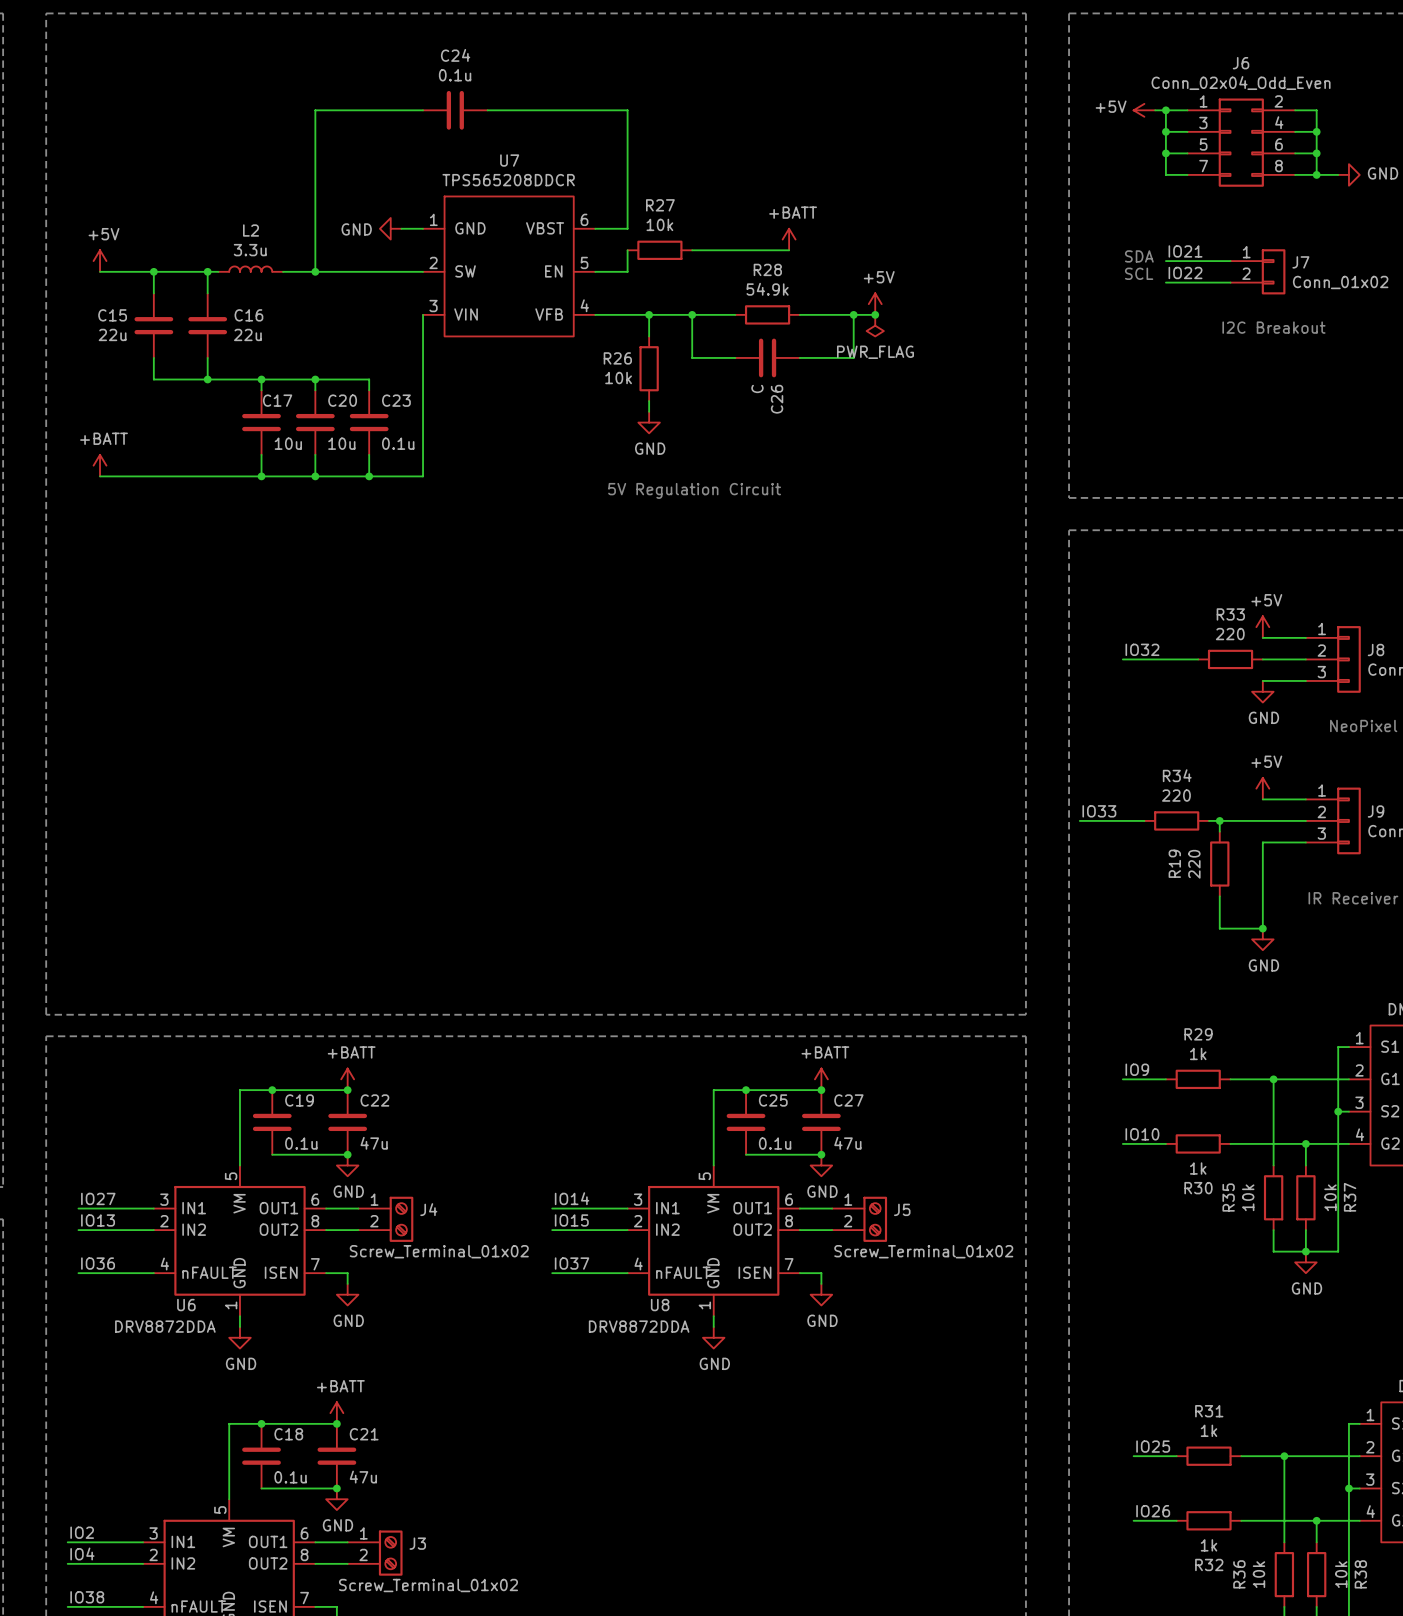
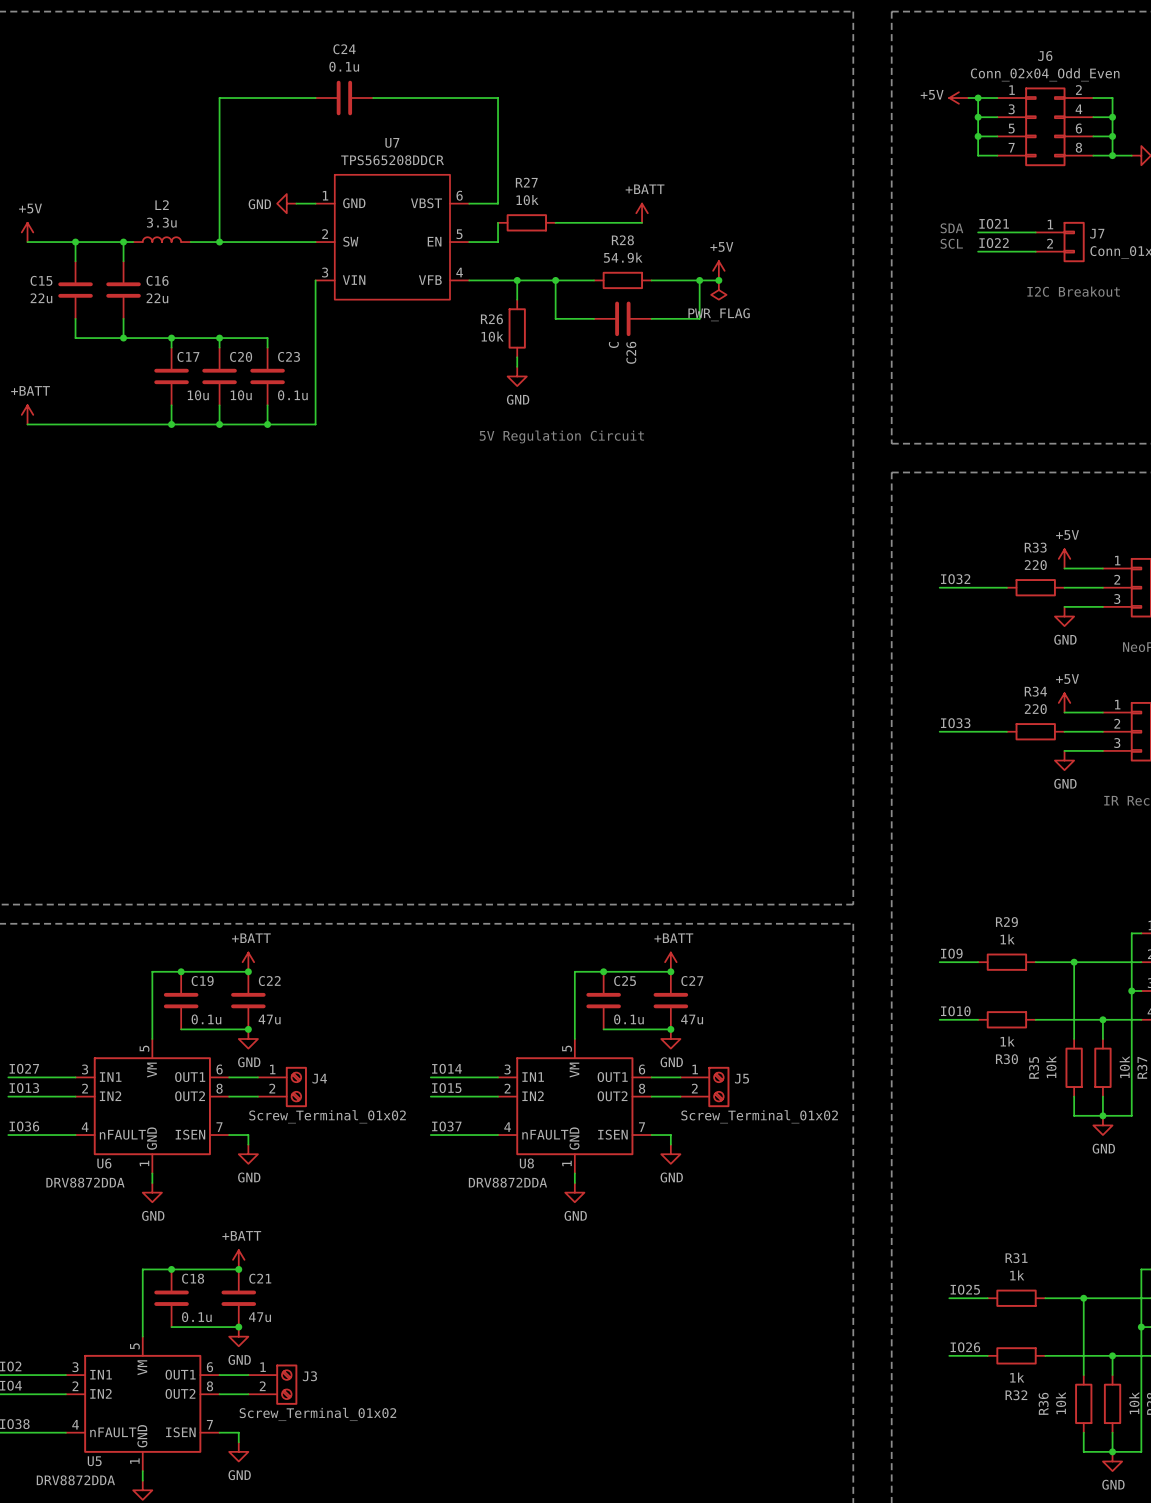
label position: IO33 (1099, 811) -> IO33 (955, 723)
wire: (1079, 820) (1122, 820) -> none
R34 position: (1176, 820) -> (1035, 731)
wire: (1209, 820) (1262, 820) -> (958, 731) (1006, 731)
wire: (1219, 820) (1219, 831) -> none
junction: (1219, 820) -> none
wire: (1262, 842) (1262, 928) (1219, 928) (1219, 896) -> none
R19: 220 (1219, 864) -> none
junction: (1262, 928) -> none
power symbol position: GND (1262, 939) -> GND (1064, 760)

